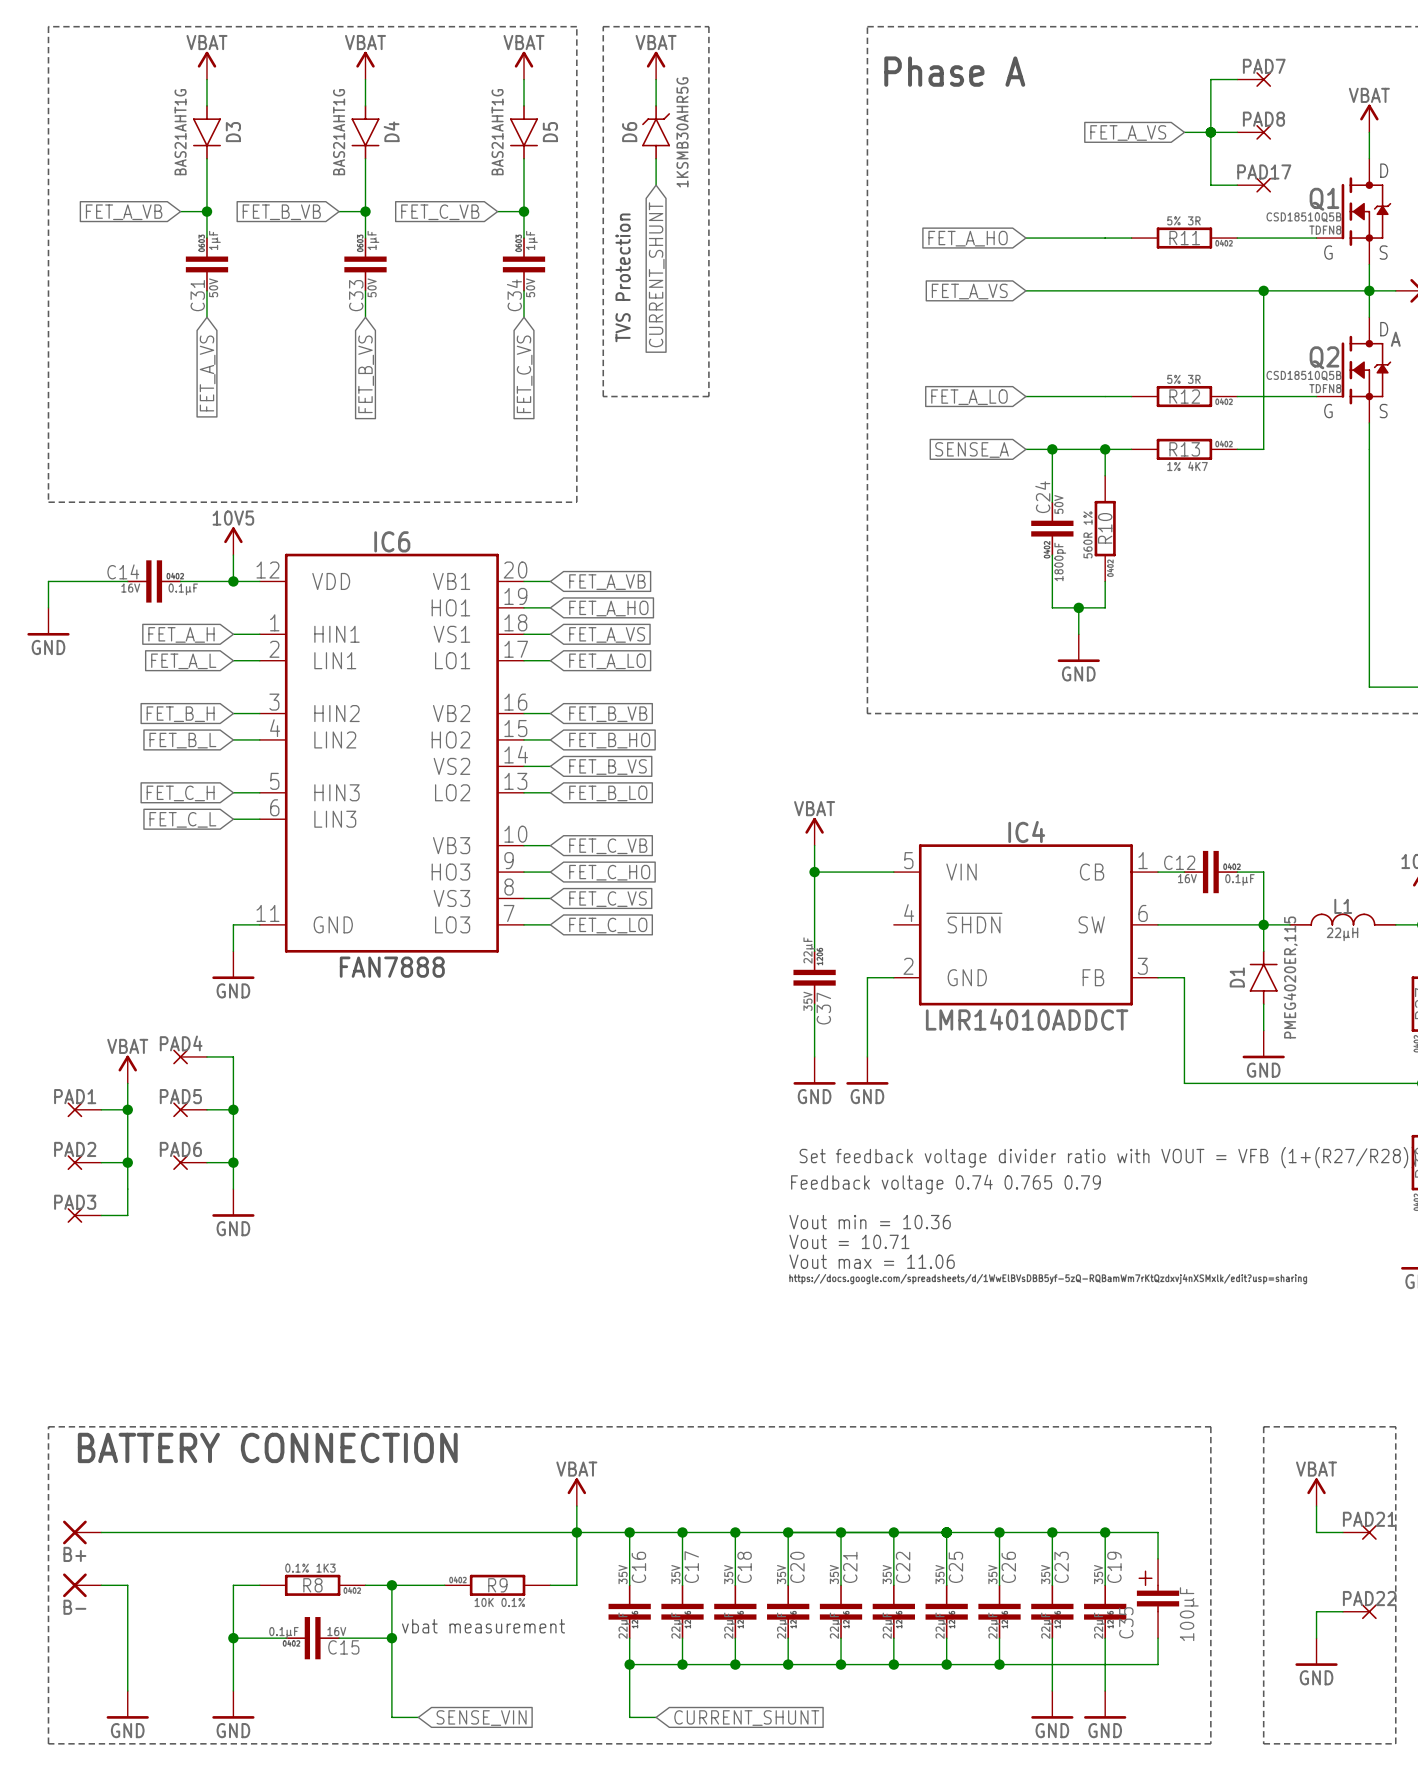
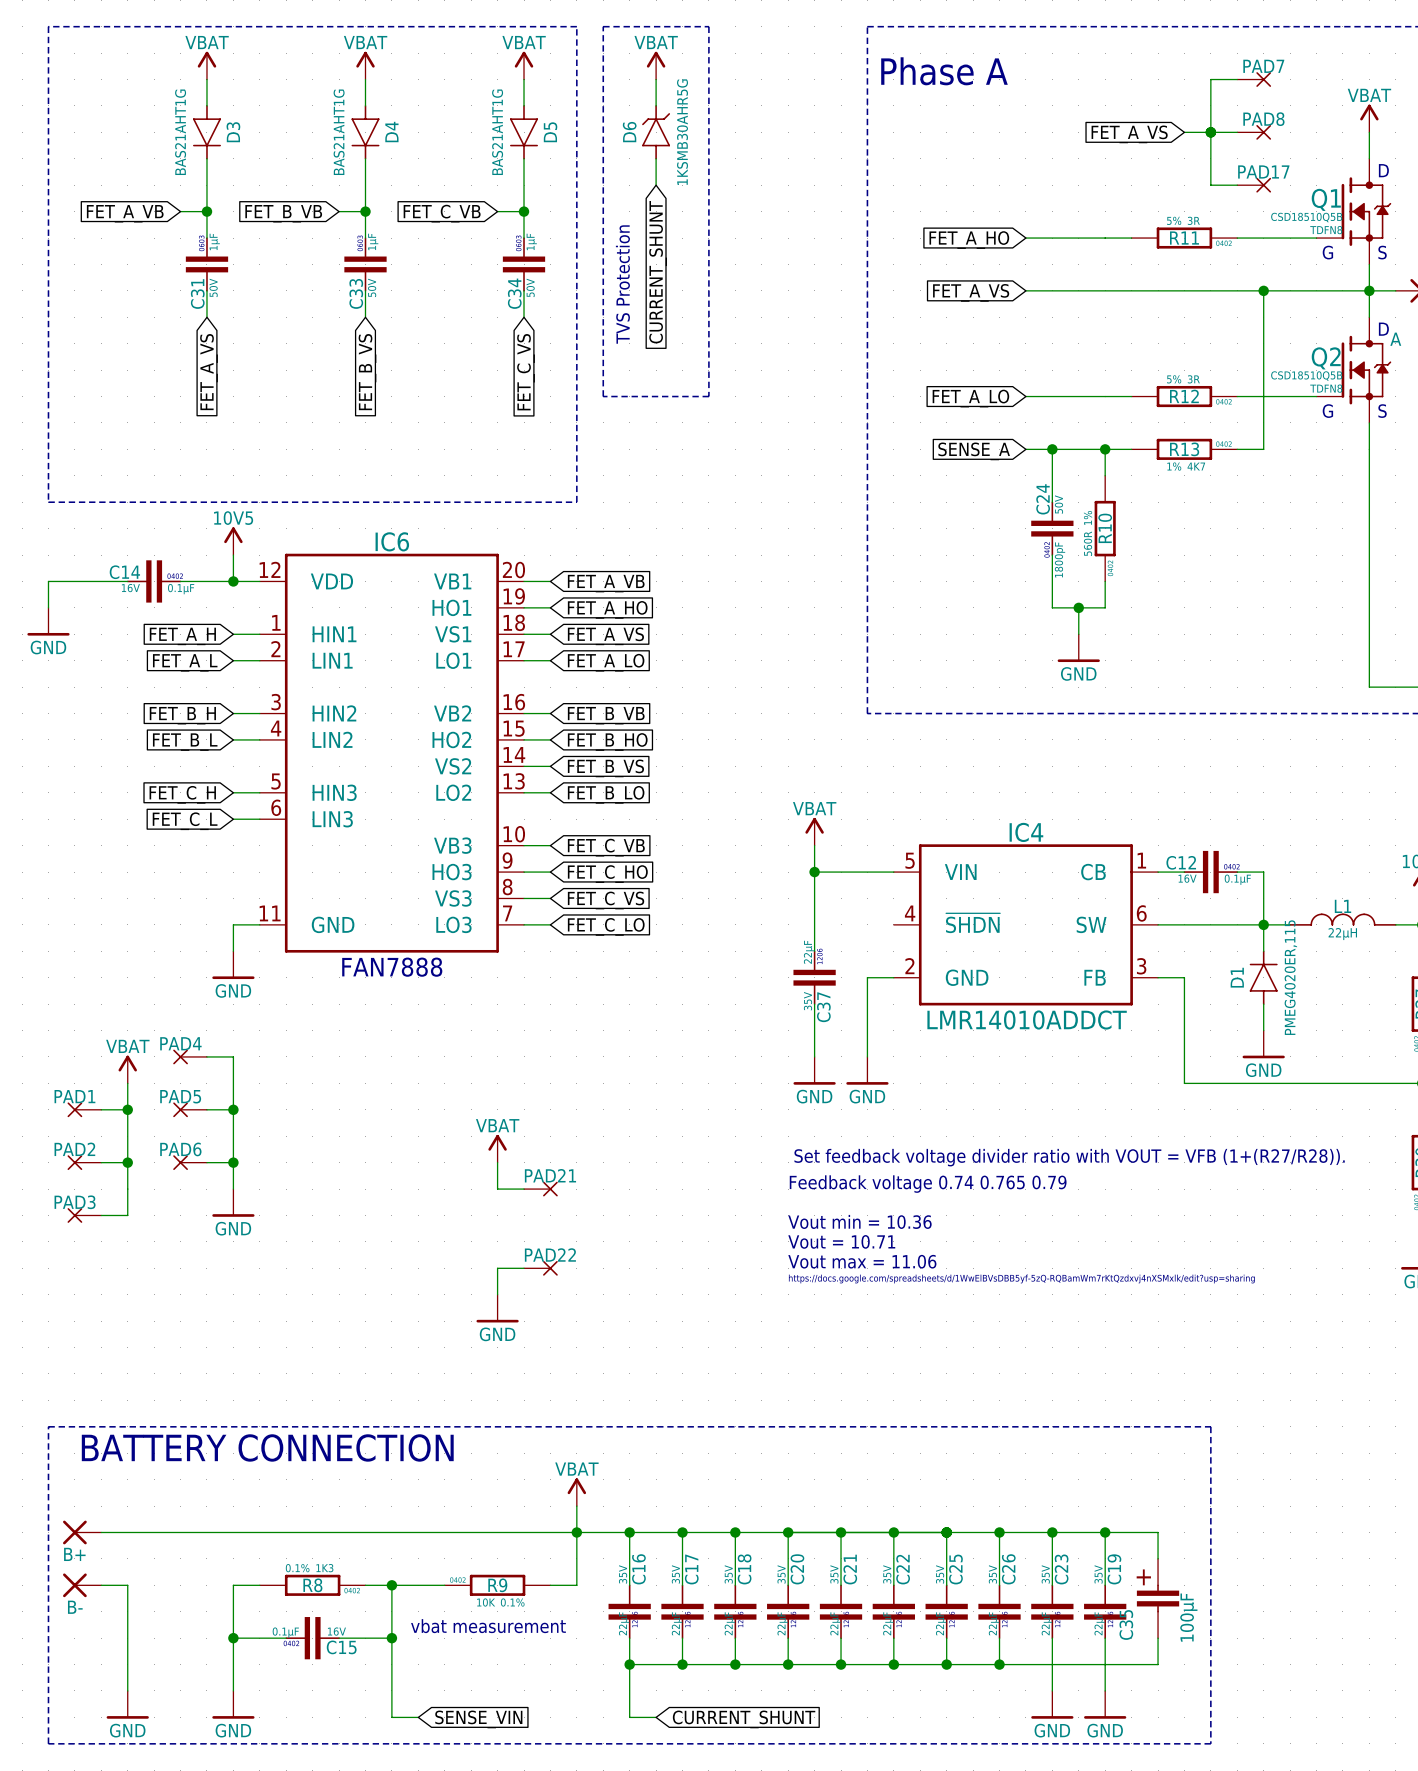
power symbol: none -> VBAT (497, 1148)
wire: none -> (497, 1162) (497, 1189) (524, 1189)
wire: none -> (524, 1268) (497, 1268) (497, 1294)
power symbol: none -> GND (497, 1308)
line: (1263, 1426) (1263, 1743) (1395, 1743) (1395, 1426) (1263, 1426) -> none
power symbol: VBAT (1316, 1492) -> none
wire: (1316, 1506) (1316, 1532) (1342, 1532) -> none
PAD21 position: (1359, 1532) -> (540, 1189)
wire: (1342, 1611) (1316, 1611) (1316, 1638) -> none
PAD22 position: (1359, 1611) -> (540, 1268)
power symbol: GND (1316, 1652) -> none

